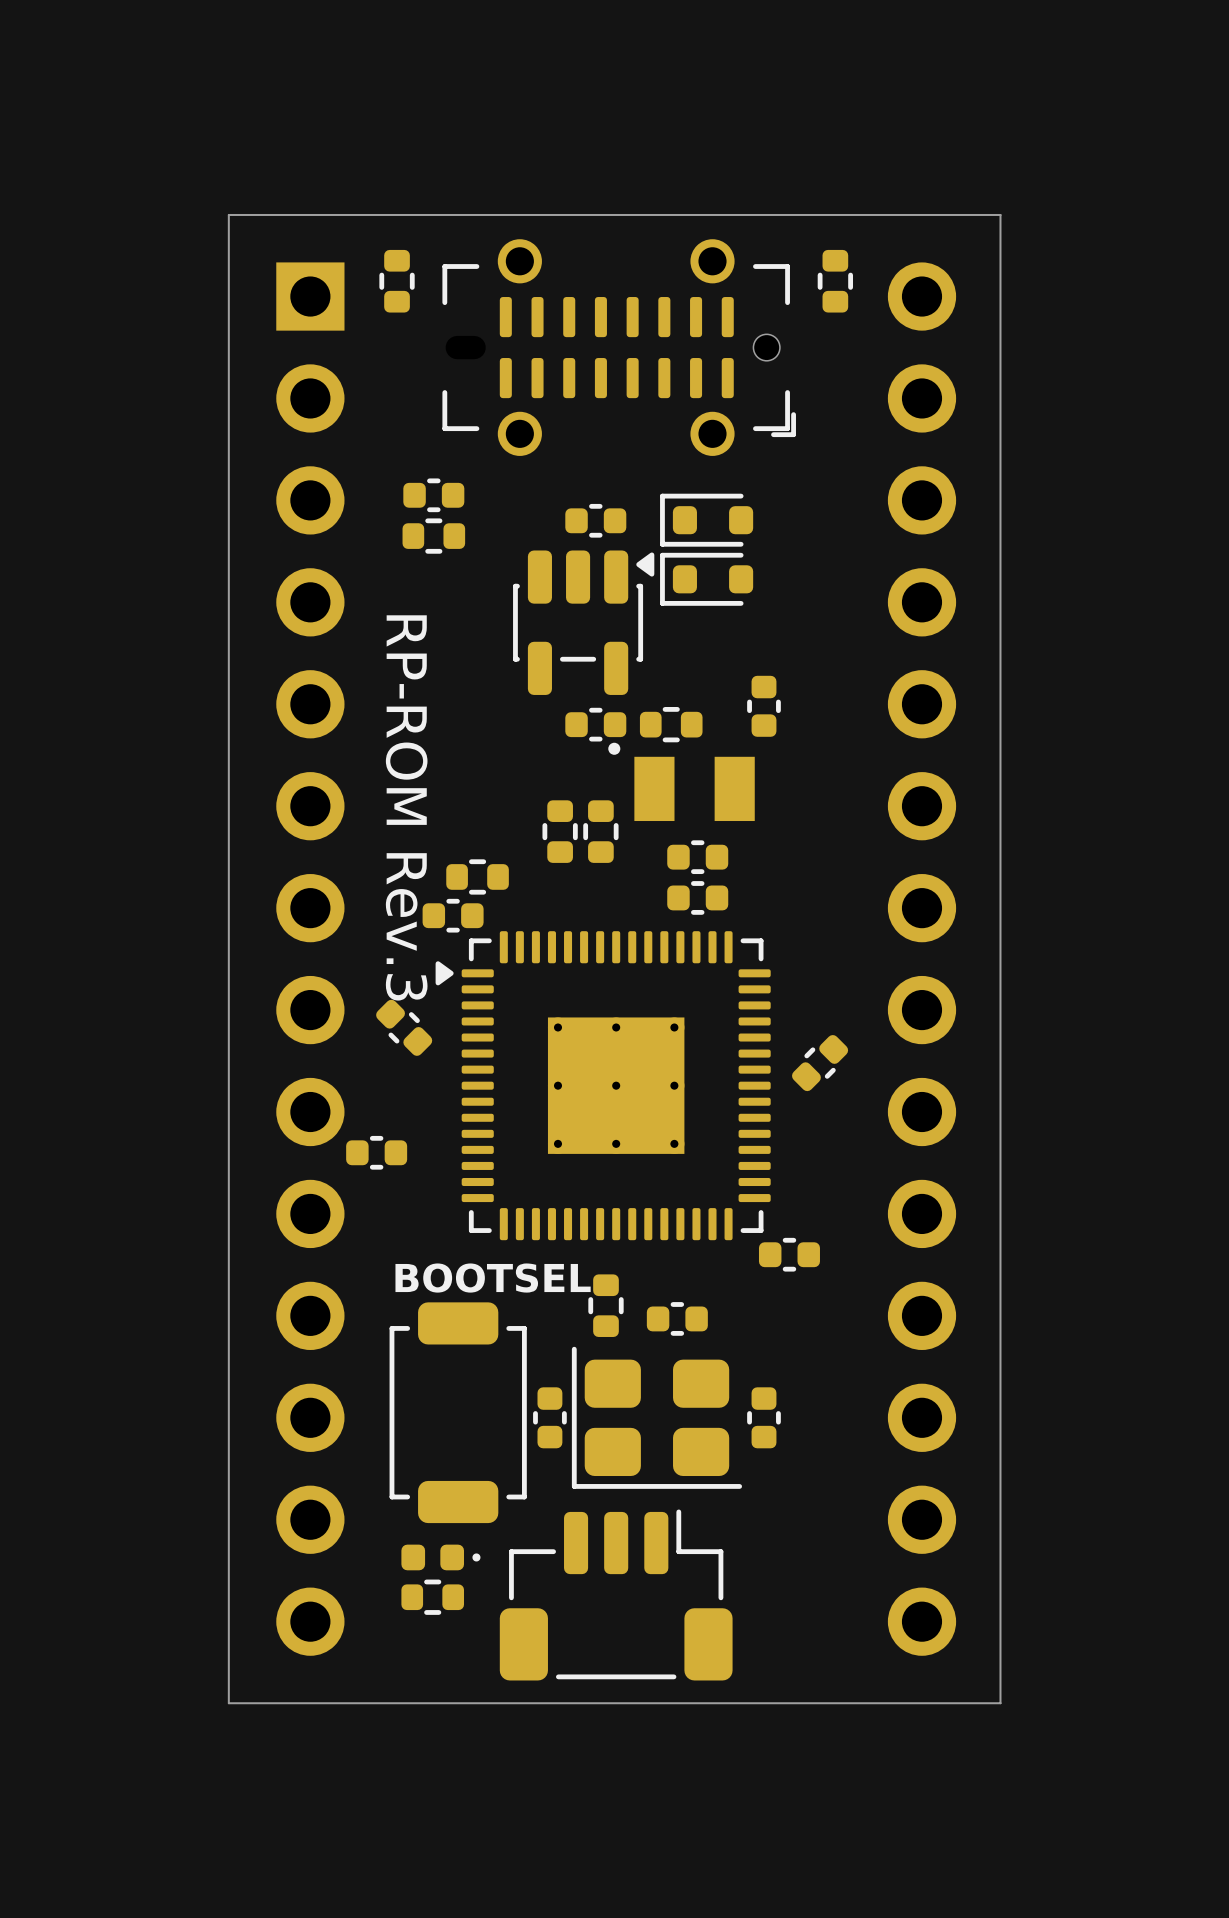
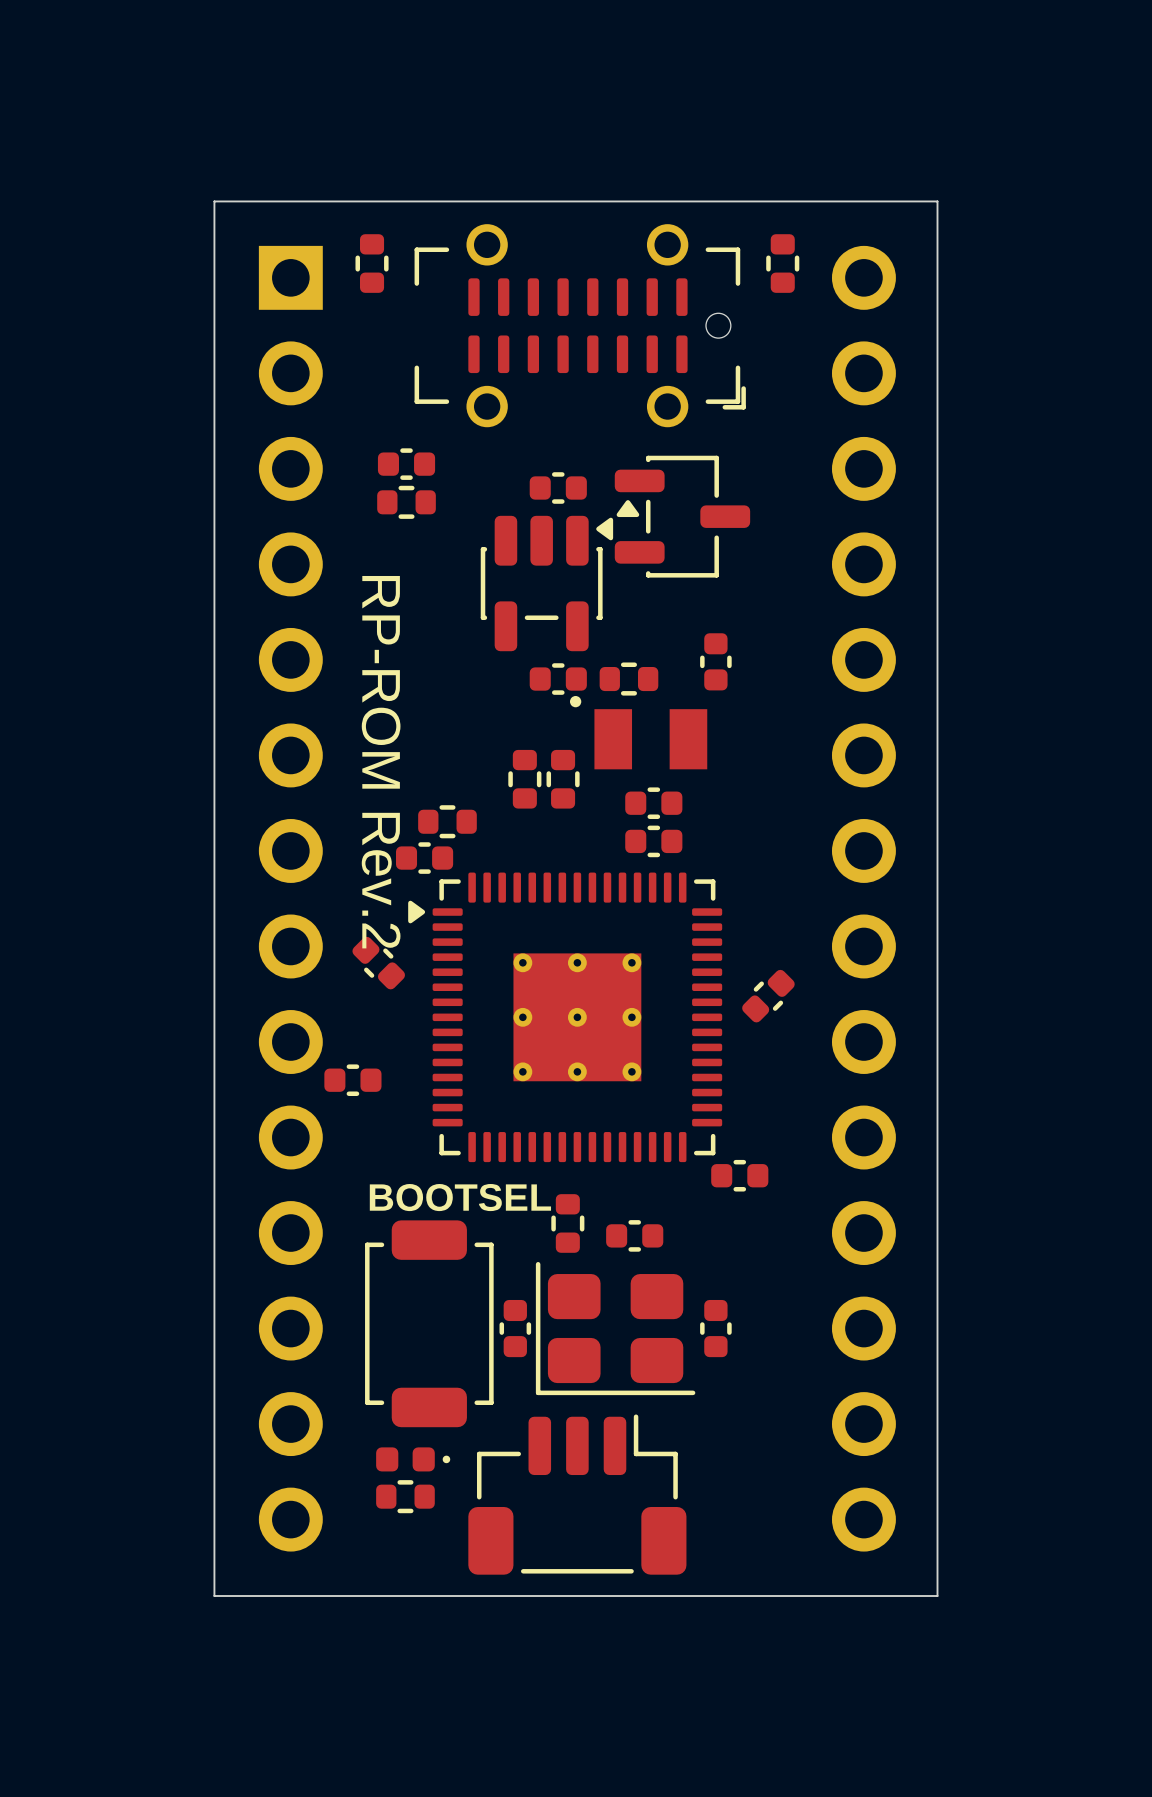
part: (706, 520) -> none
part: none -> (682, 516)
part: (706, 579) -> none
text: RP-ROM Rev.3 (406, 807) -> RP-ROM Rev.2 (381, 762)

